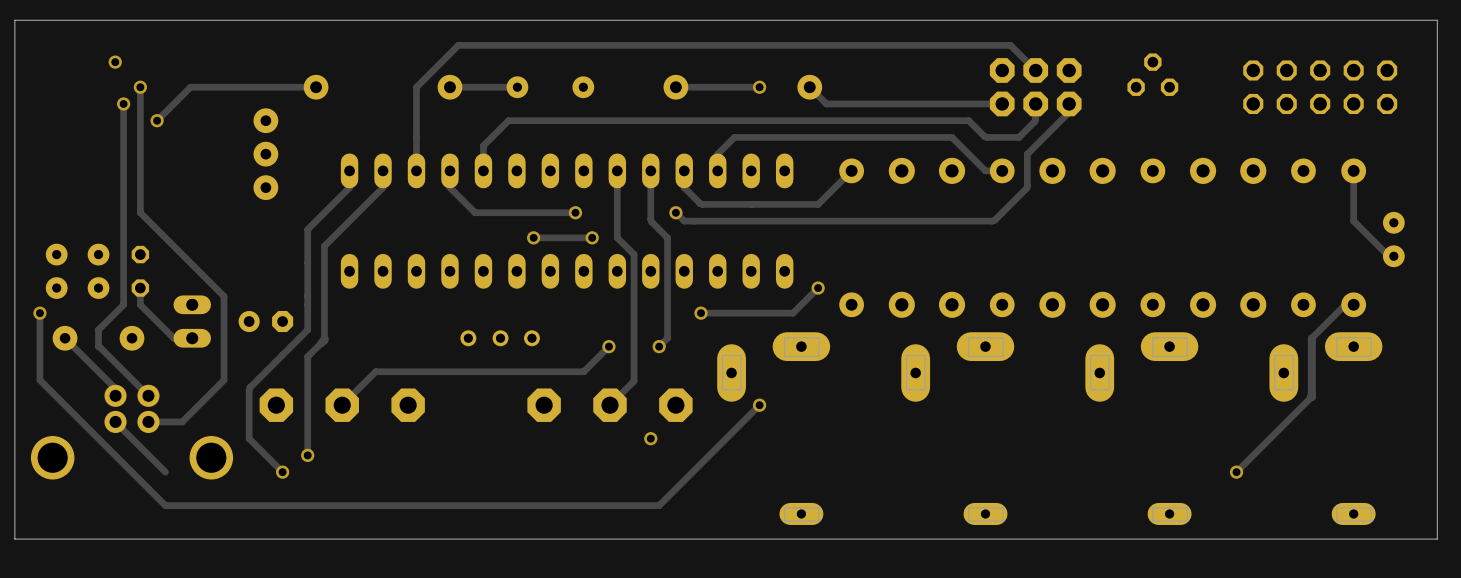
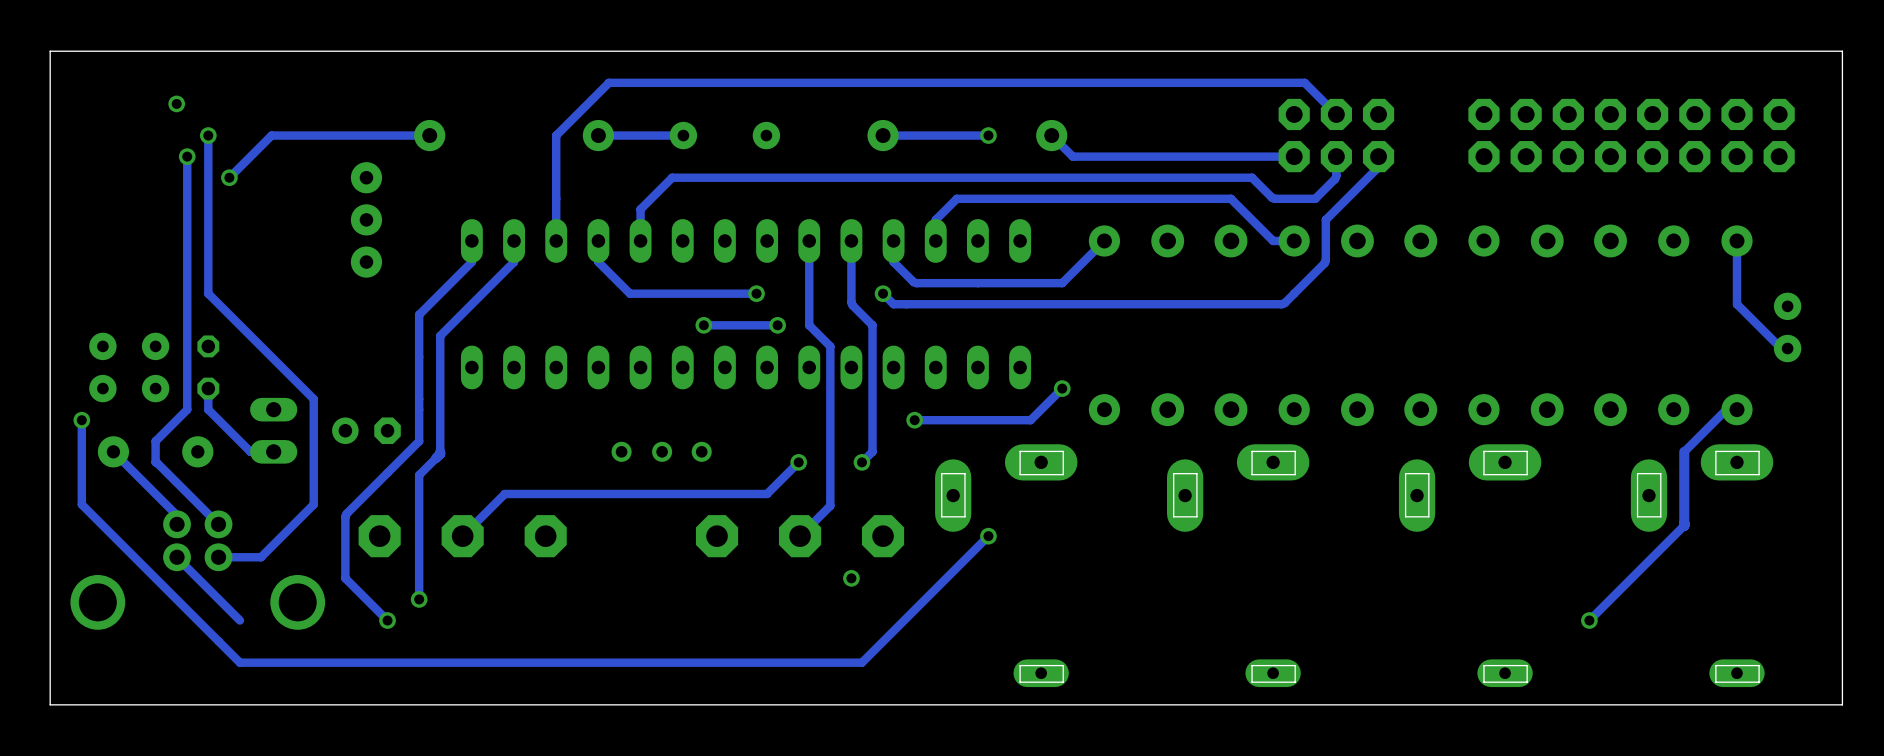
part: (1152, 74) -> none
part: none -> (1631, 135)
part: (1320, 87) -> none

